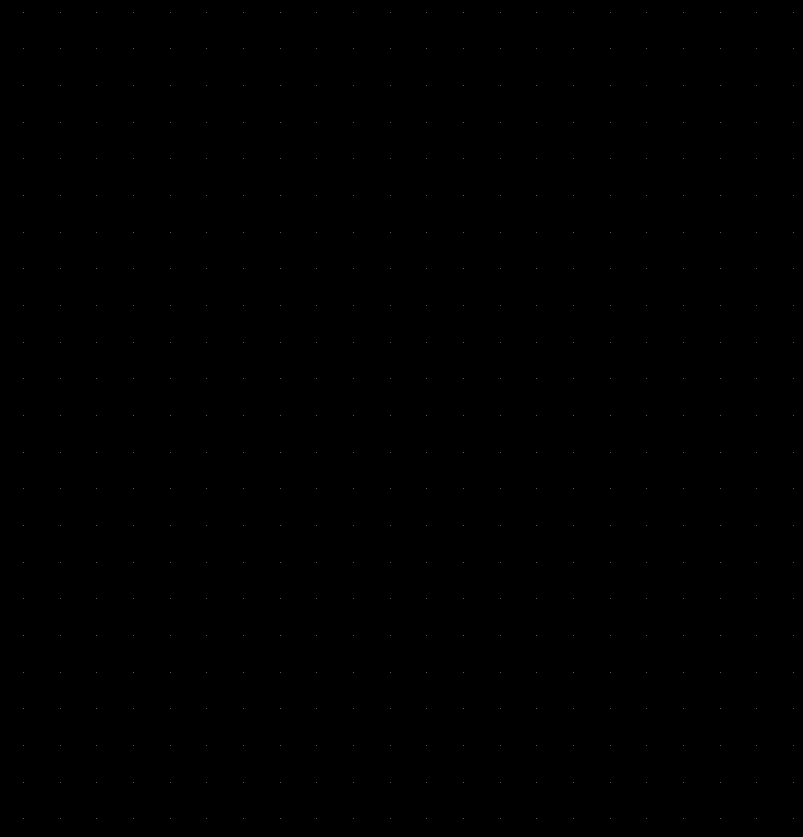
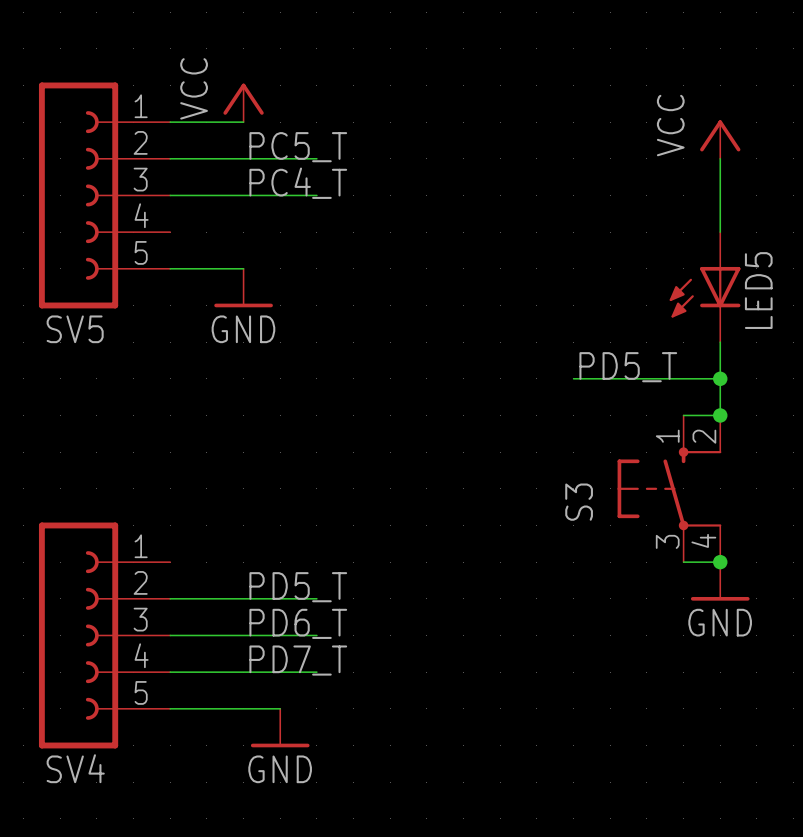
power symbol: none -> VCC (243, 102)
wire: none -> (170, 122) (243, 122)
power symbol: none -> VCC (720, 139)
label: none -> PC5_T (298, 147)
wire: none -> (170, 158) (316, 158)
wire: none -> (720, 158) (720, 232)
label: none -> PC4_T (298, 183)
SV5: none -> (104, 195)
wire: none -> (170, 195) (316, 195)
wire: none -> (170, 268) (243, 268)
LED5: none -> (705, 287)
power symbol: none -> GND (243, 288)
wire: none -> (720, 342) (720, 415) (683, 415)
label: none -> PD5_T (628, 367)
wire: none -> (573, 378) (720, 378)
junction: none -> (720, 378)
junction: none -> (720, 415)
S3: none -> (669, 488)
wire: none -> (683, 562) (720, 562)
junction: none -> (720, 562)
power symbol: none -> GND (720, 581)
label: none -> PD5_T (298, 587)
wire: none -> (170, 598) (316, 598)
label: none -> PD6_T (298, 623)
SV4: none -> (104, 635)
wire: none -> (170, 635) (316, 635)
label: none -> PD7_T (298, 660)
wire: none -> (170, 672) (316, 672)
wire: none -> (170, 708) (280, 708)
power symbol: none -> GND (280, 728)

